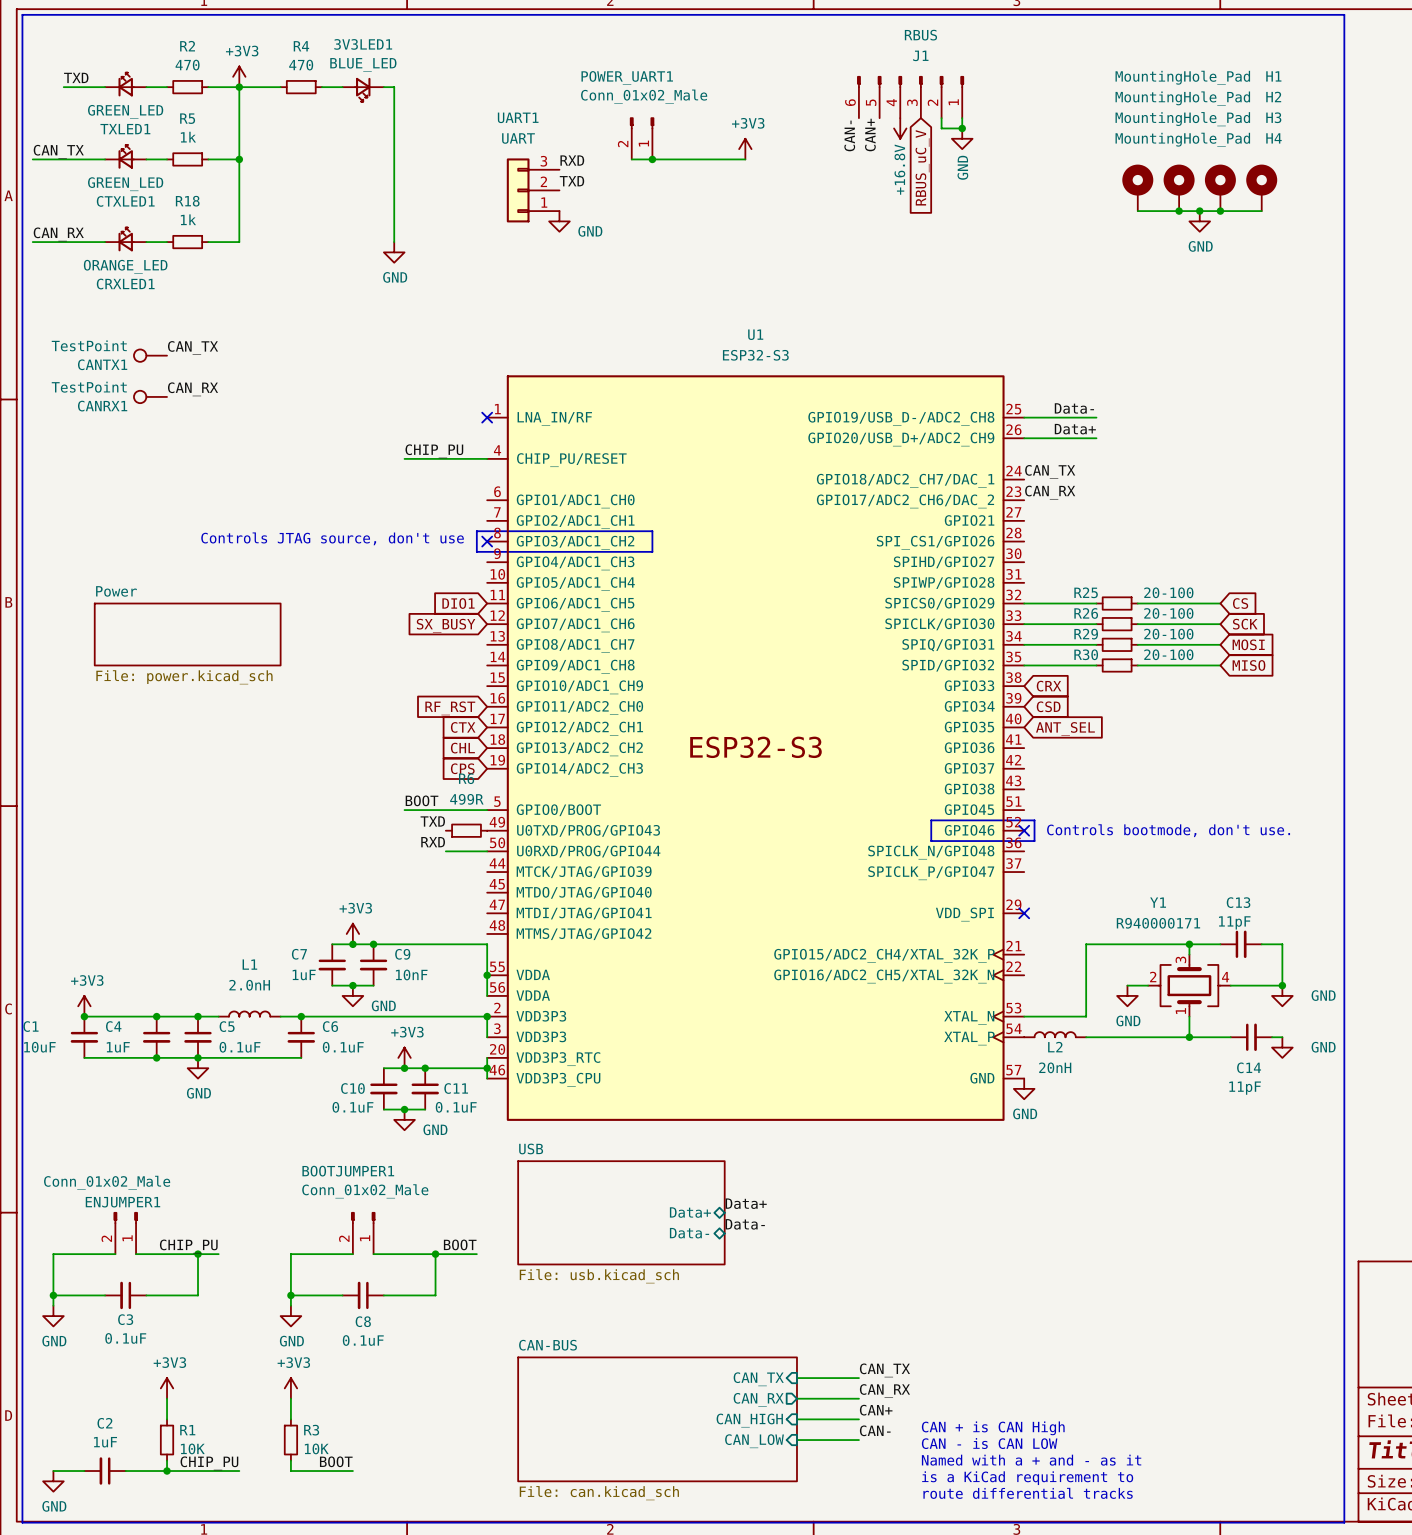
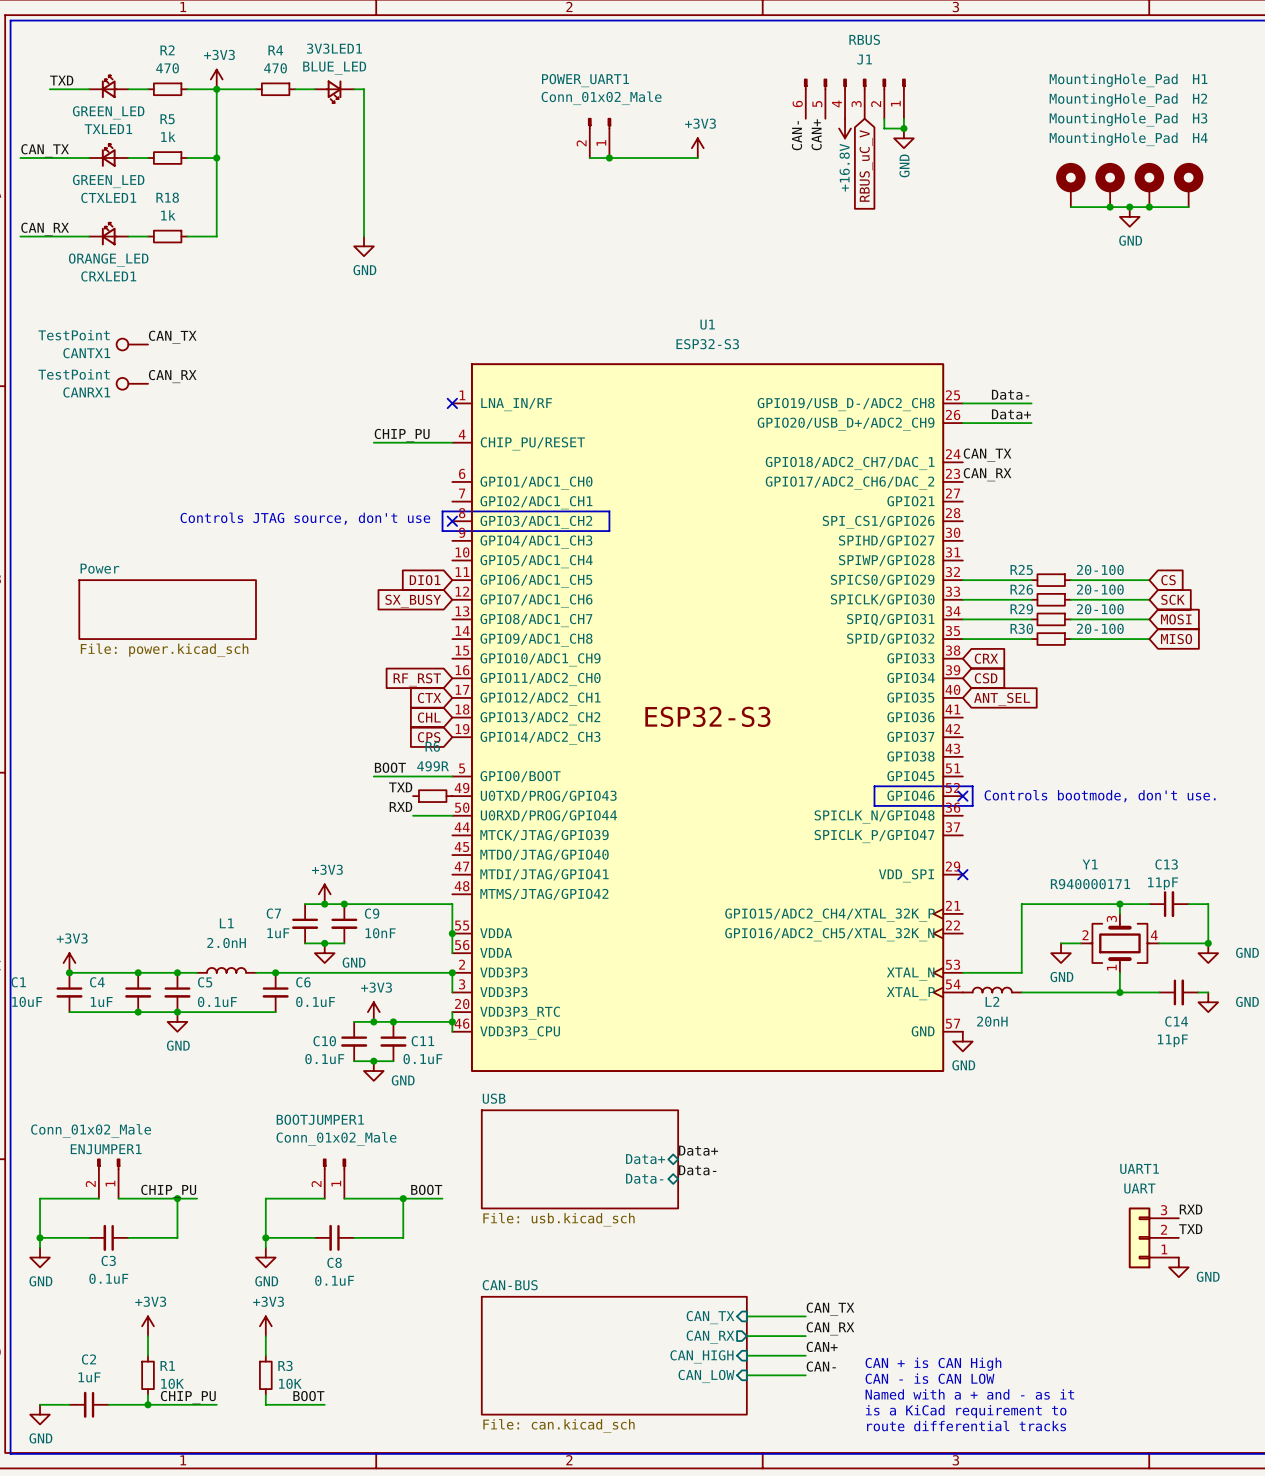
label: RXD (572, 160) -> none
label: TXD (571, 181) -> none
UART1 position: (533, 190) -> (1153, 1237)
power symbol: GND (559, 221) -> none
label: none -> RXD (1191, 1209)
label: none -> TXD (1190, 1229)
power symbol: none -> GND (1178, 1267)

